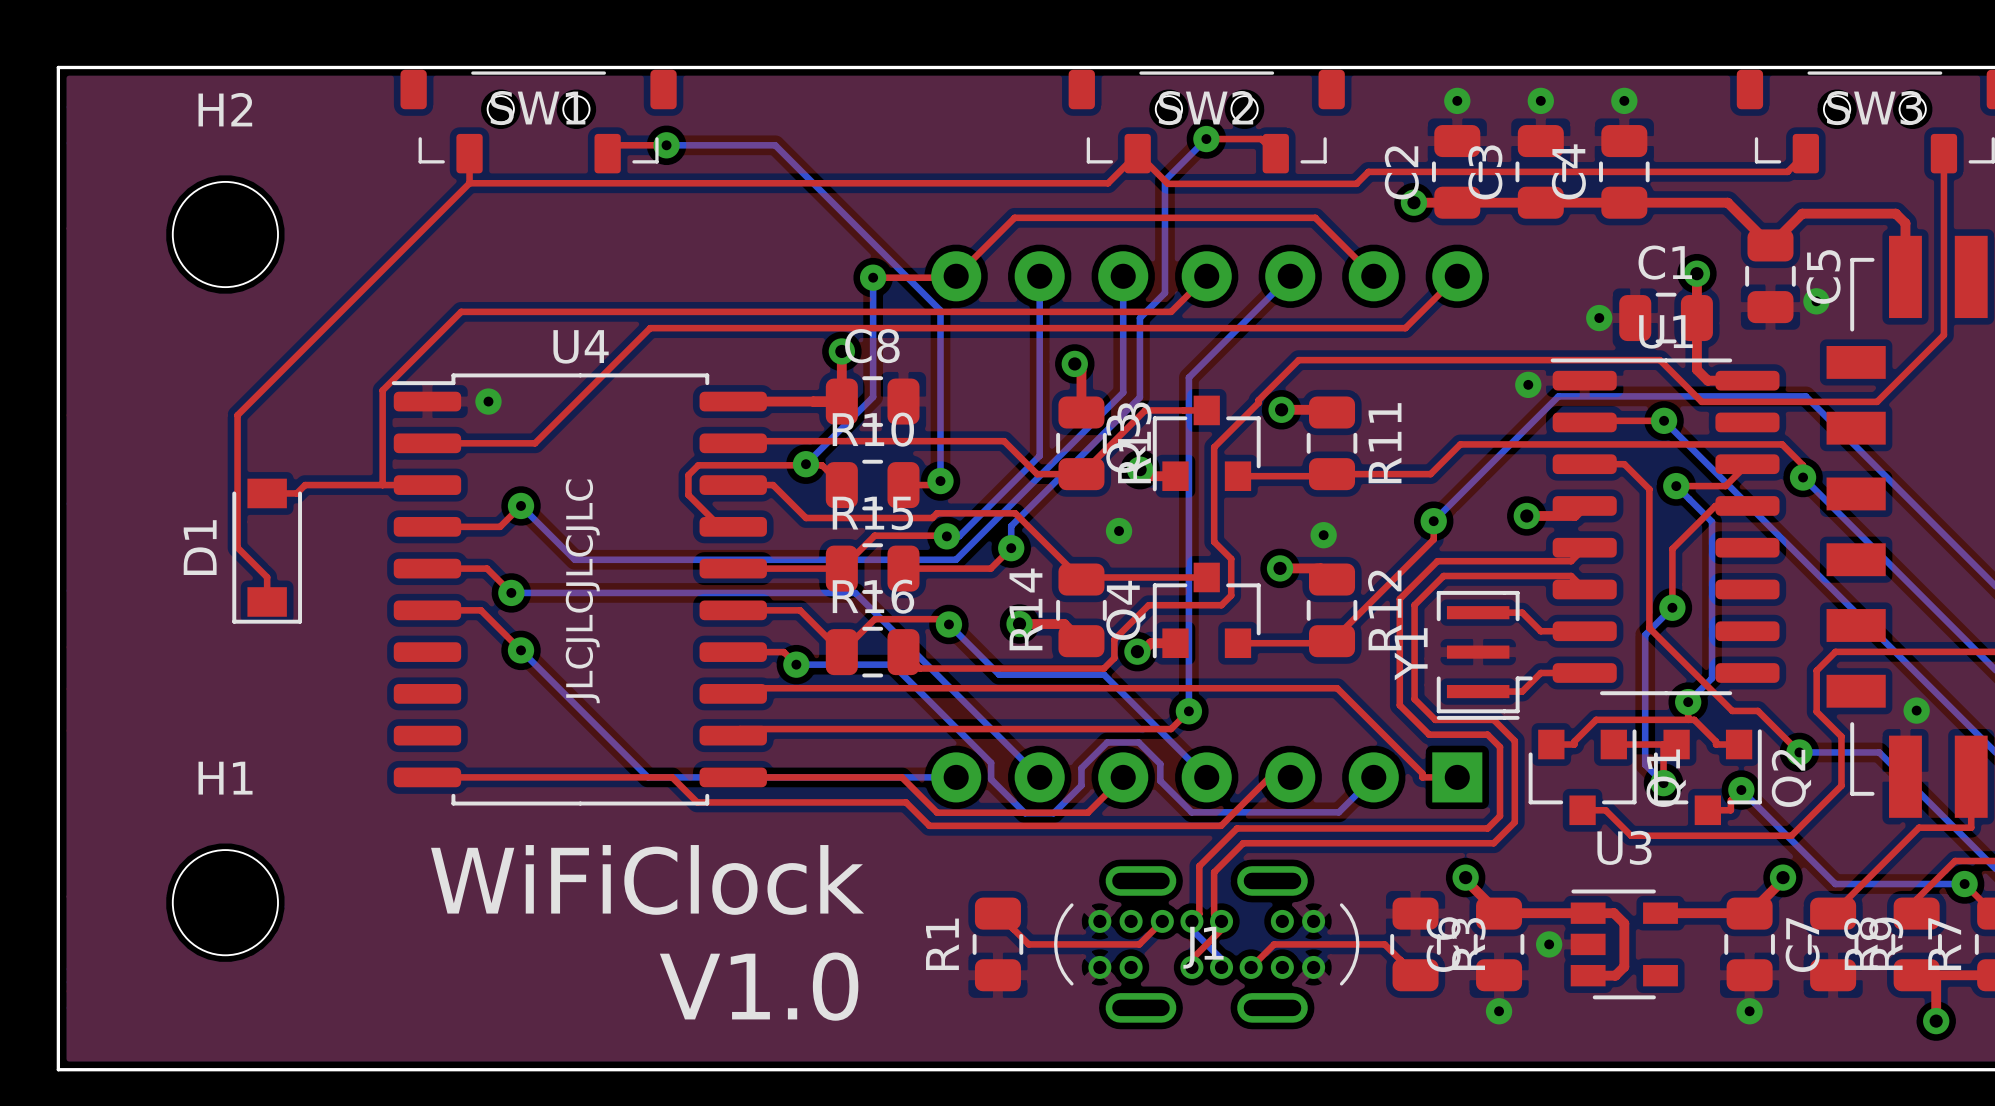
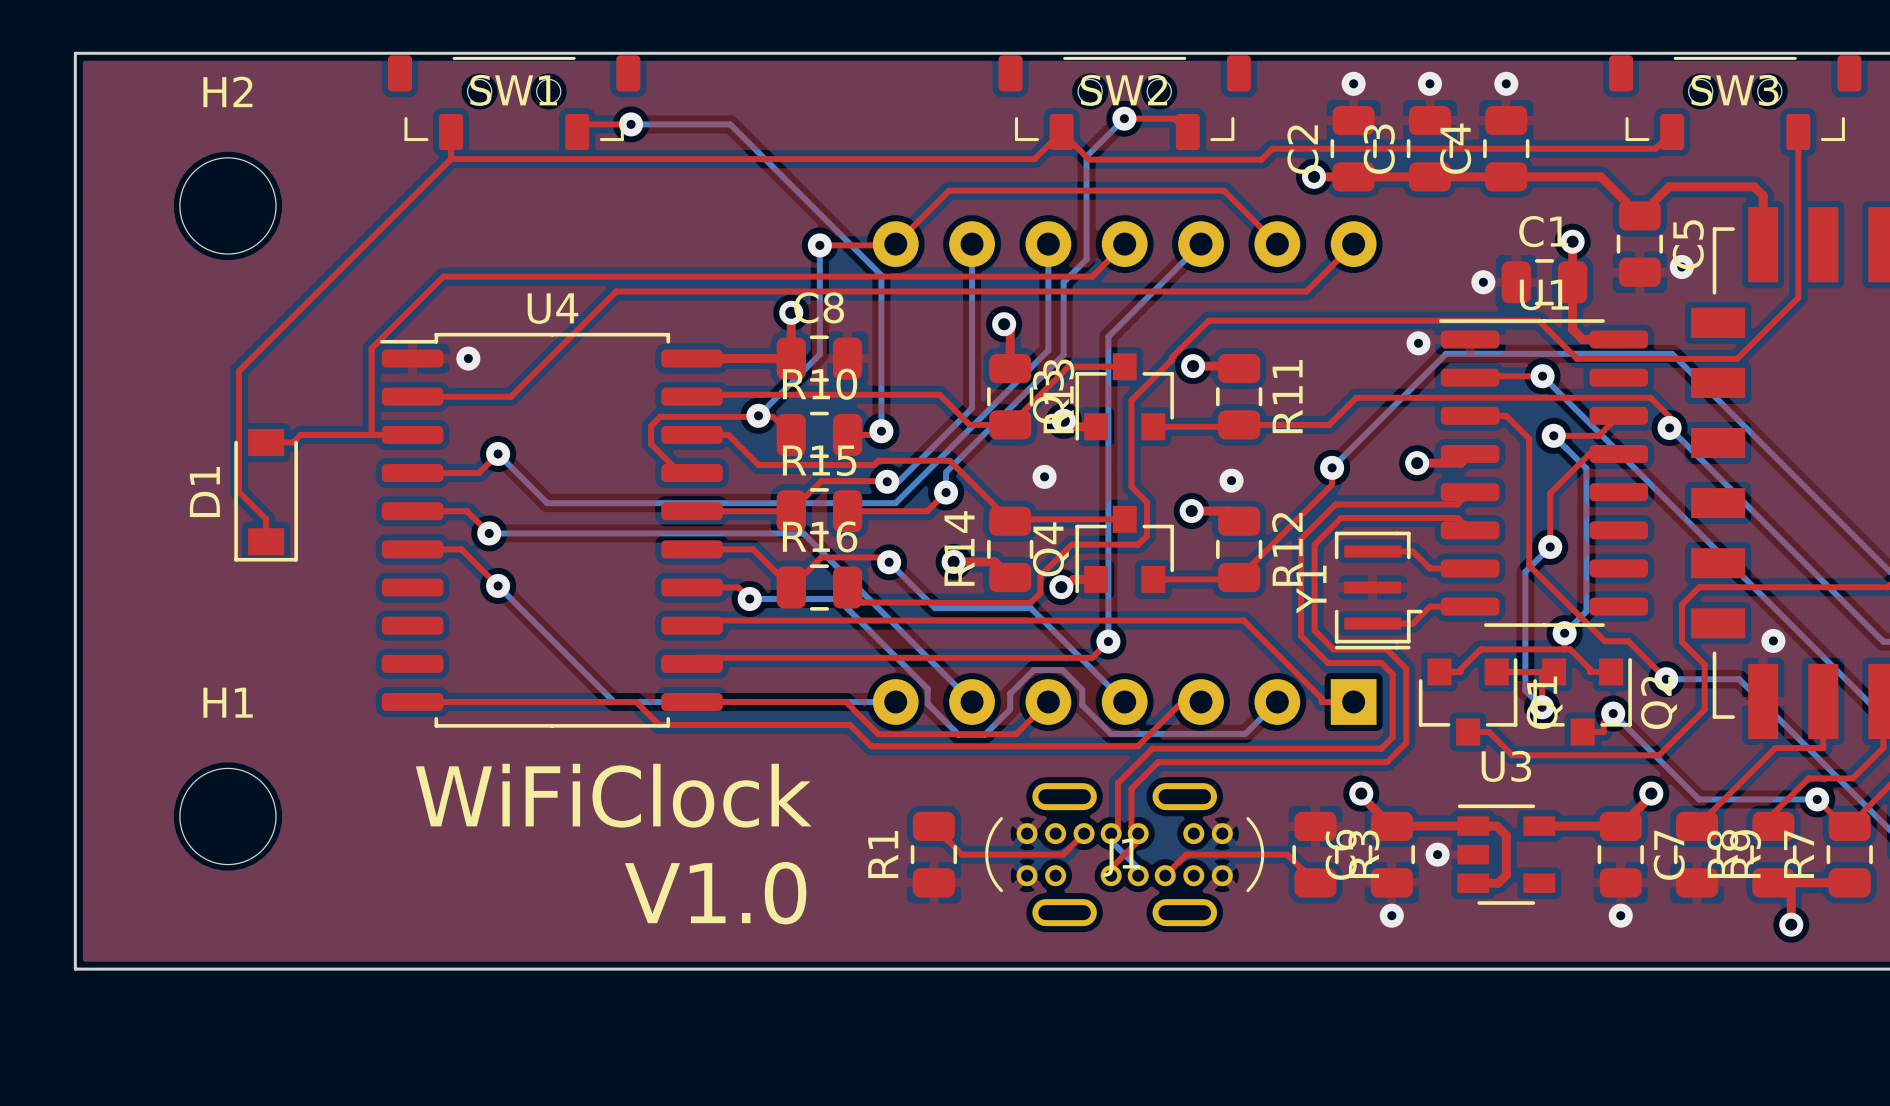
text: JLCJLCJLCJLC (582, 591) -> none

